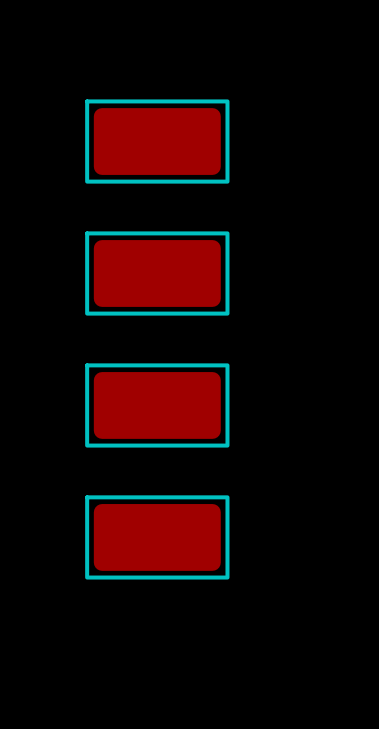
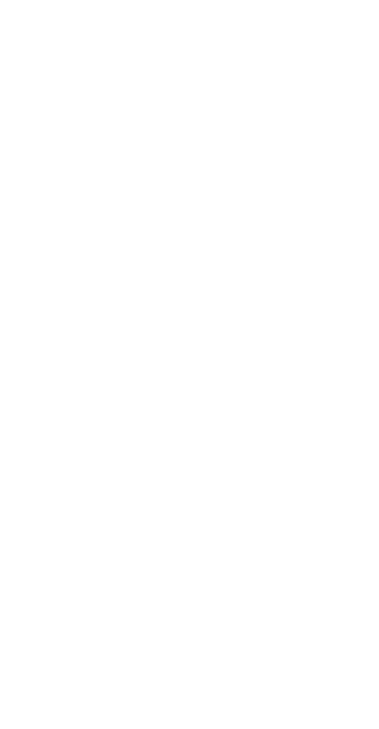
part: (157, 141) -> none
part: (157, 273) -> none
part: (157, 405) -> none
part: (157, 537) -> none

